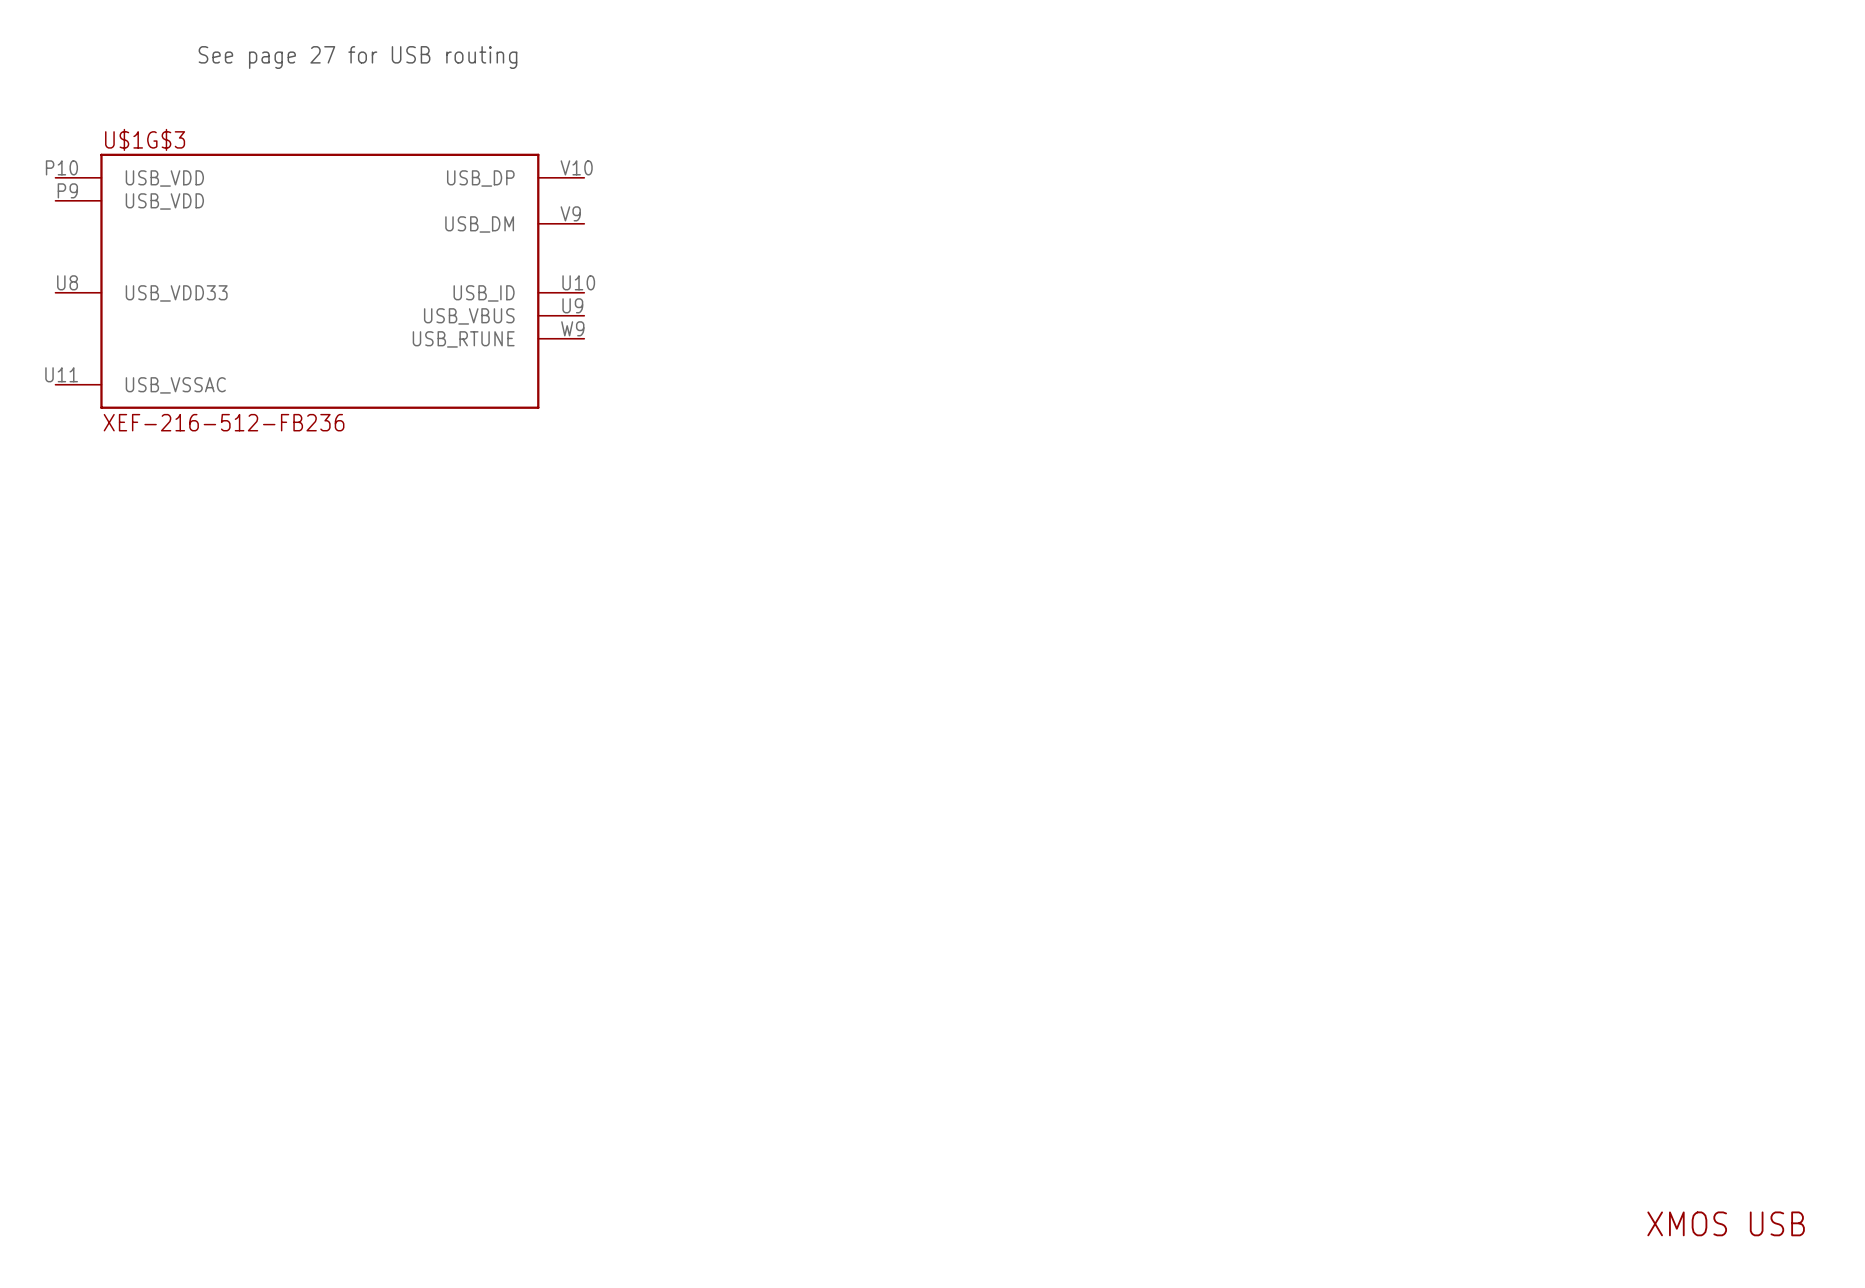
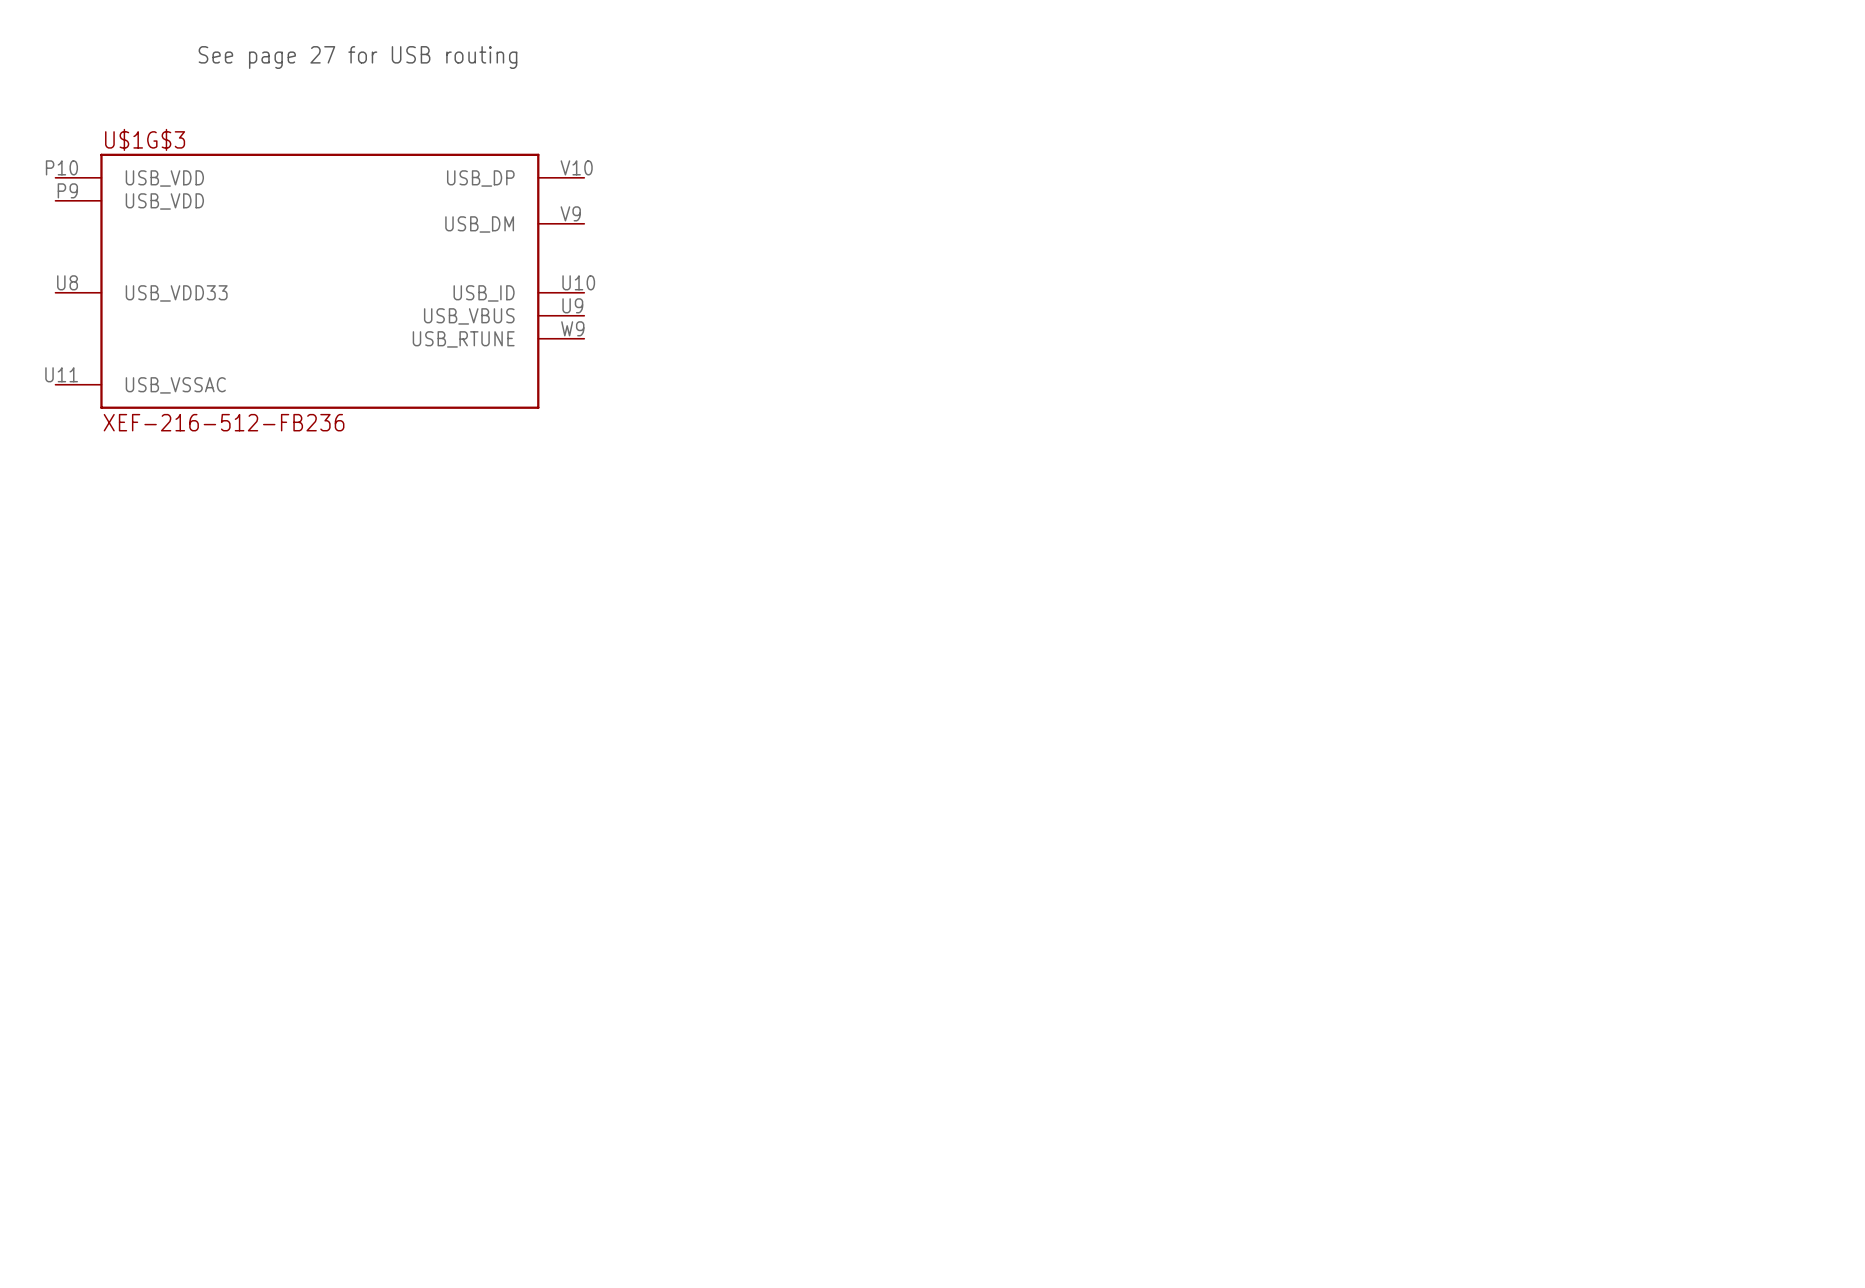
text: XMOS USB (1726, 1223) -> none

